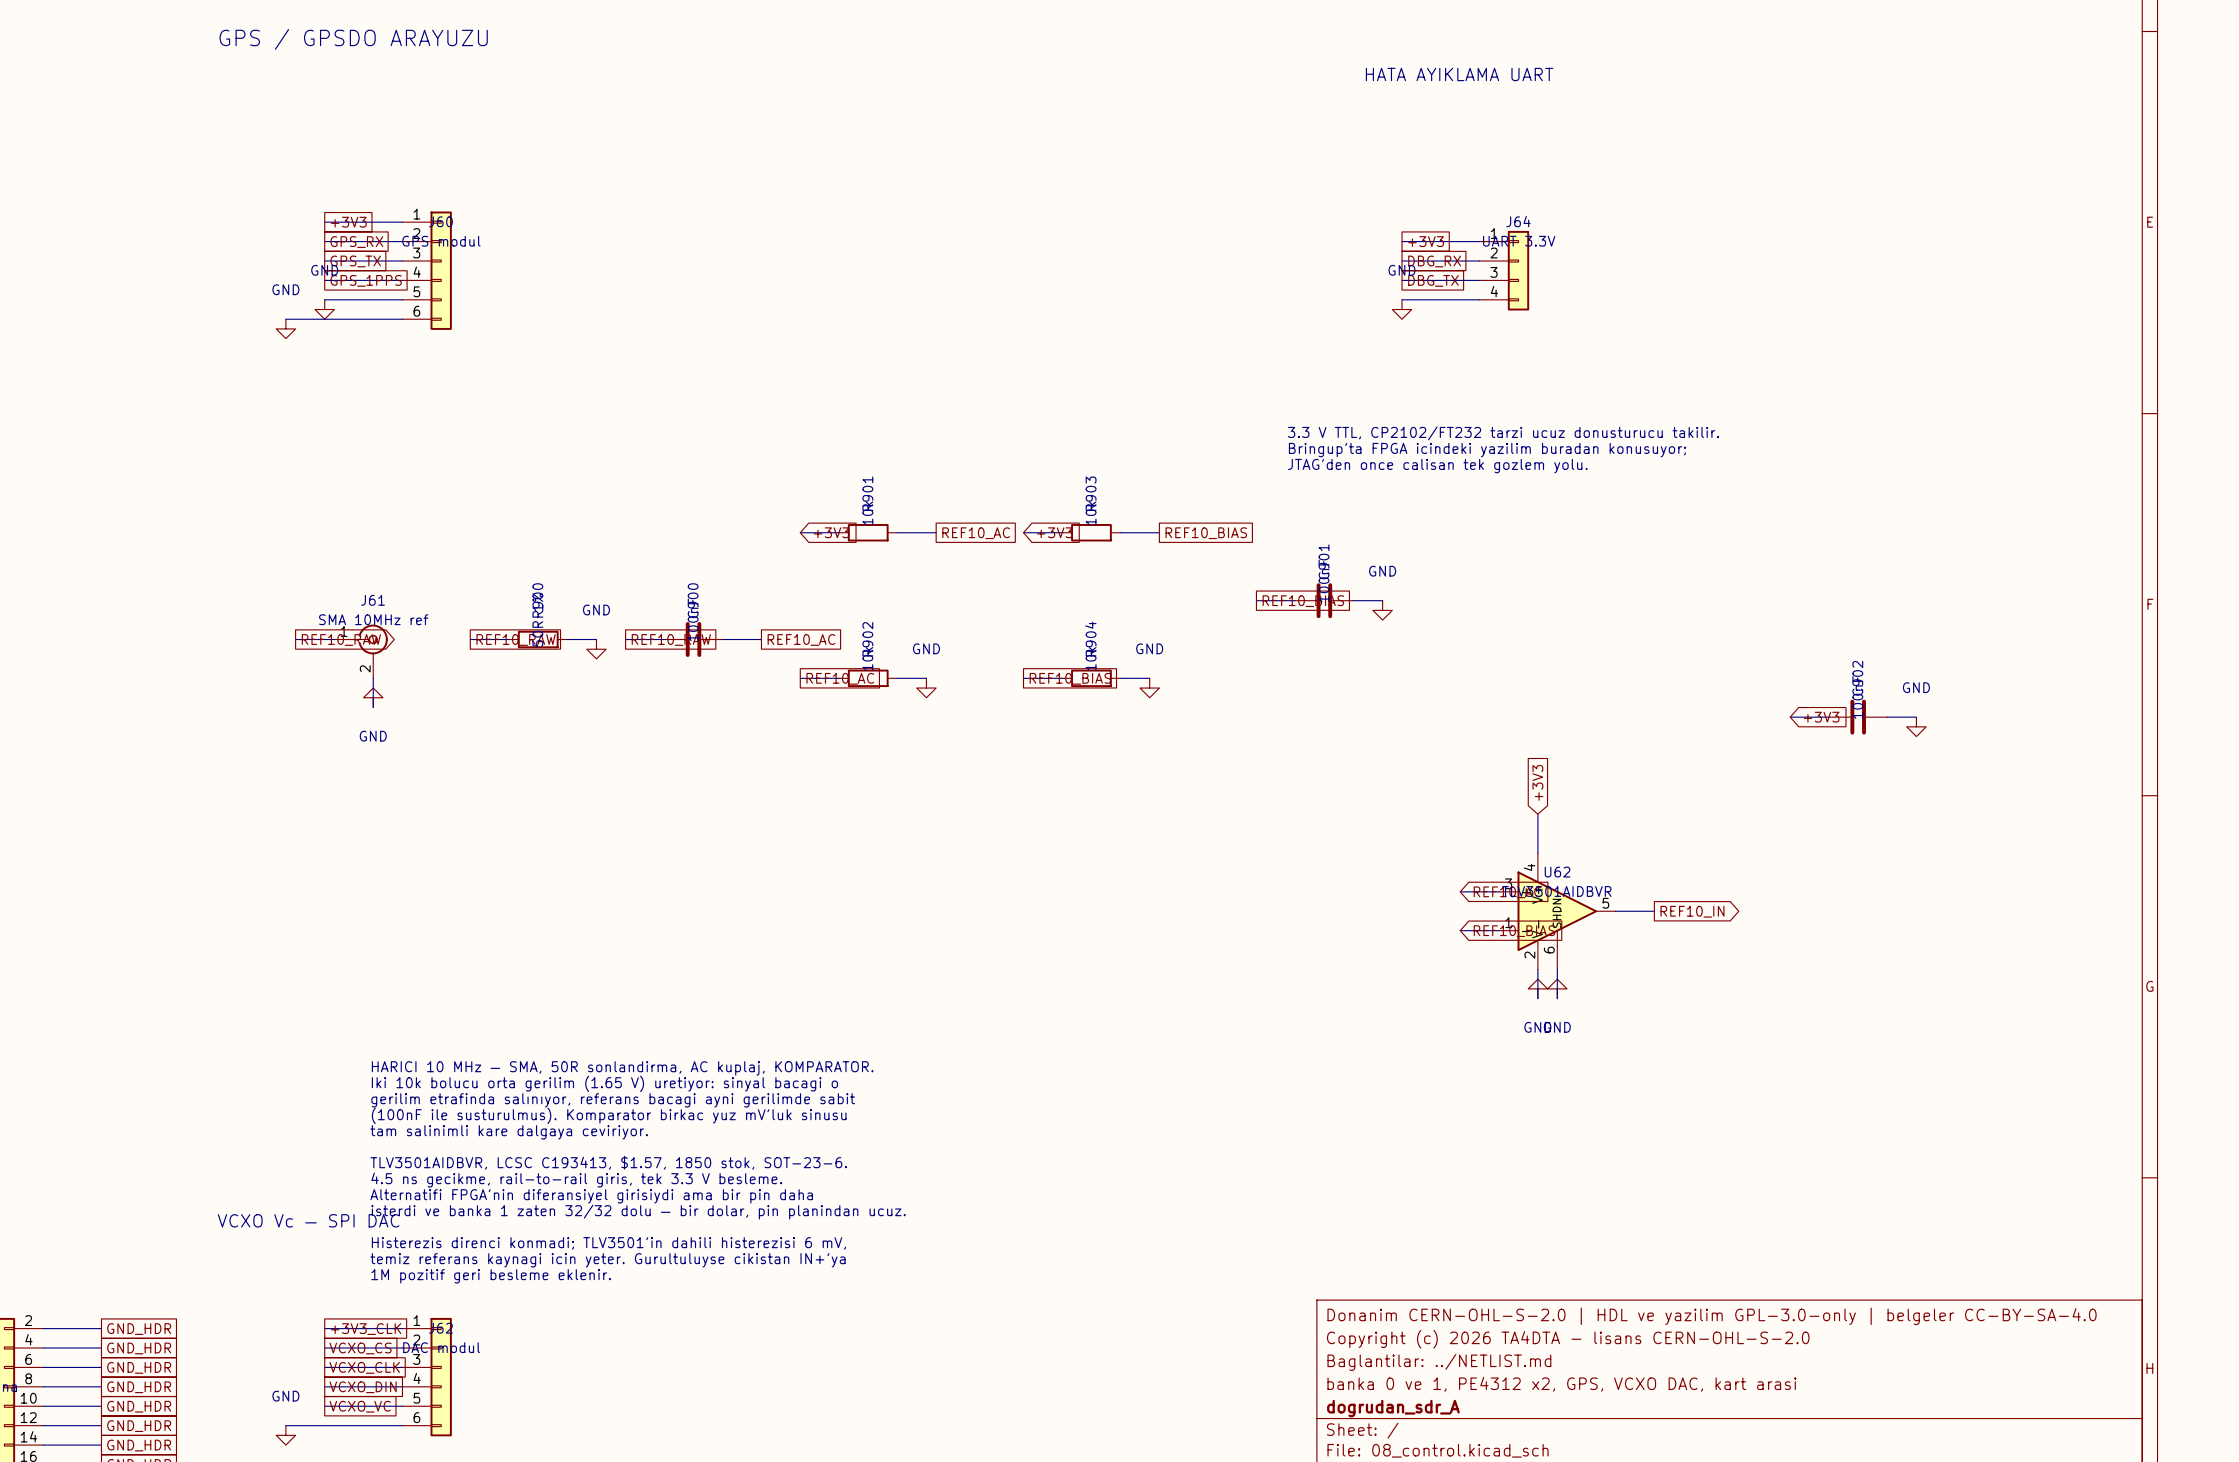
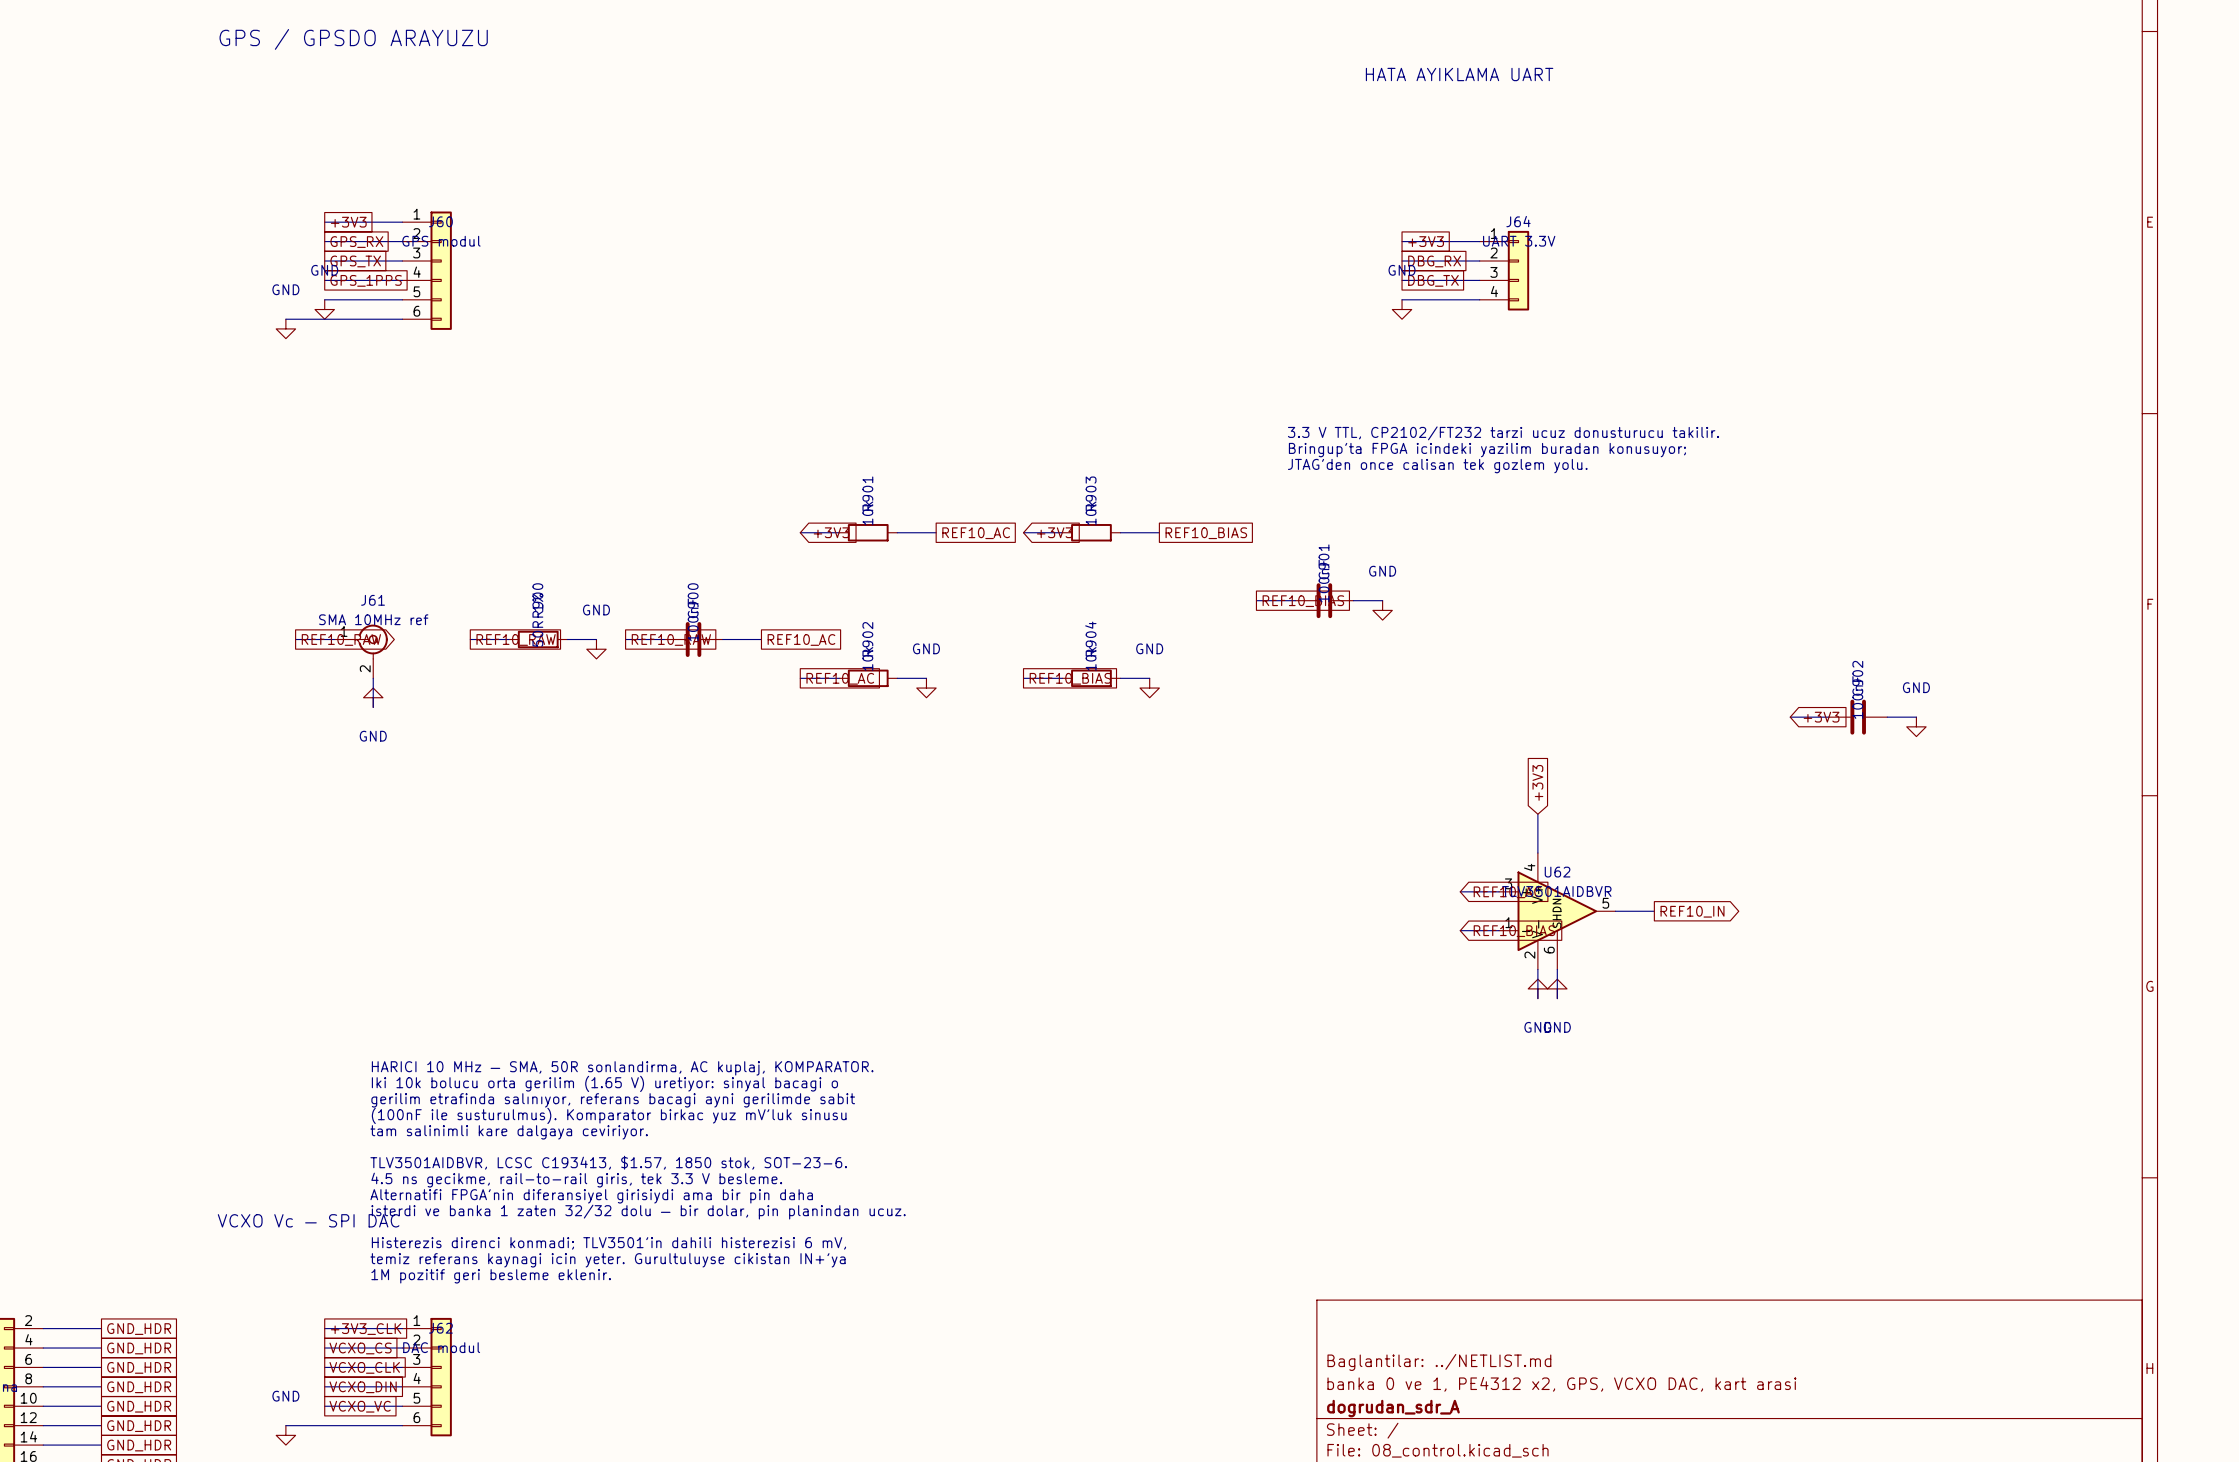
title block: Donanim CERN-OHL-S-2.0 | HDL ve yazilim GPL-3.0-only | belgeler CC-BY-SA-4.0 (1712, 1316) -> none
title block: Copyright (c) 2026 TA4DTA - lisans CERN-OHL-S-2.0 (1568, 1339) -> none

